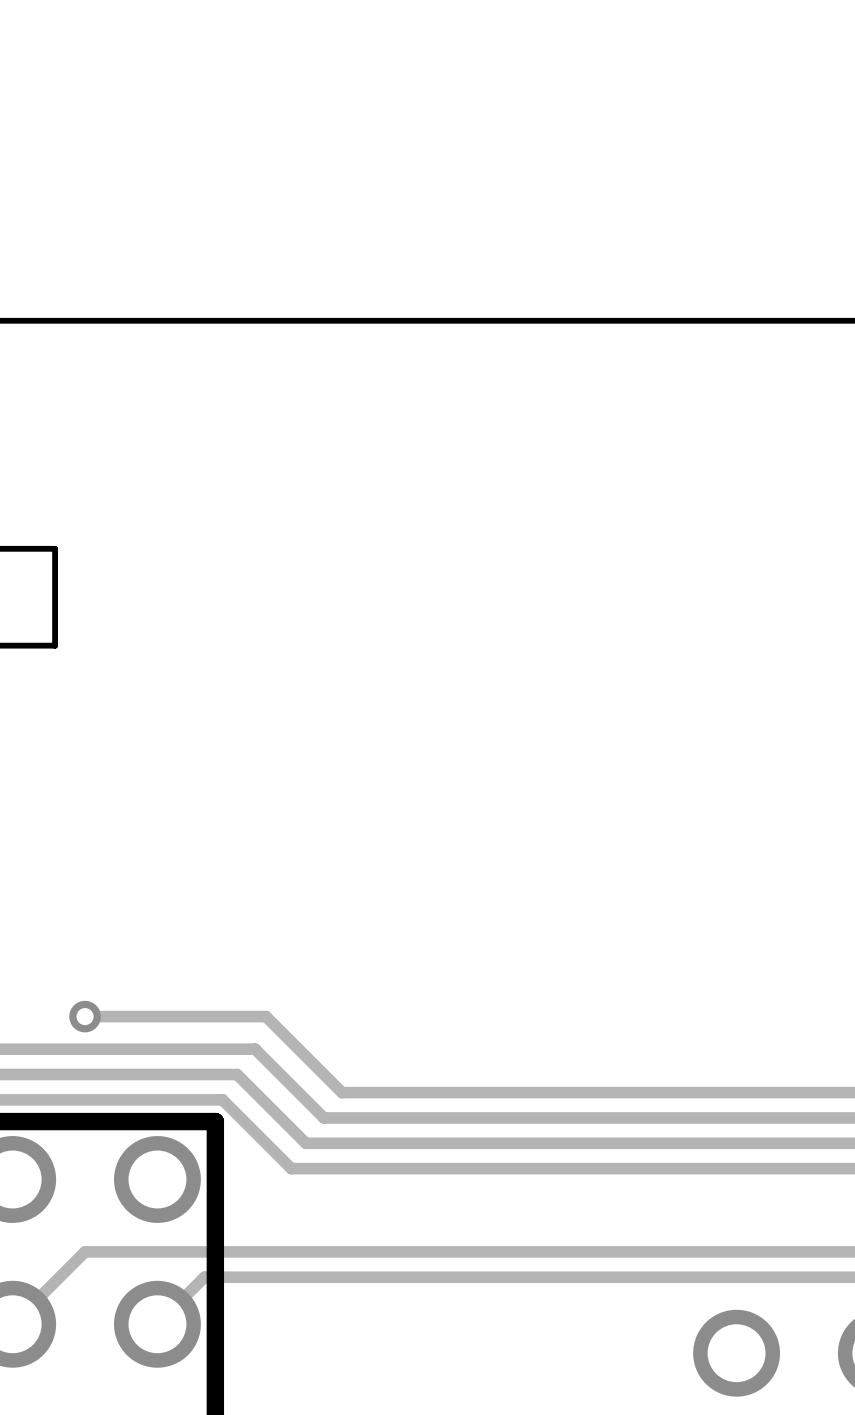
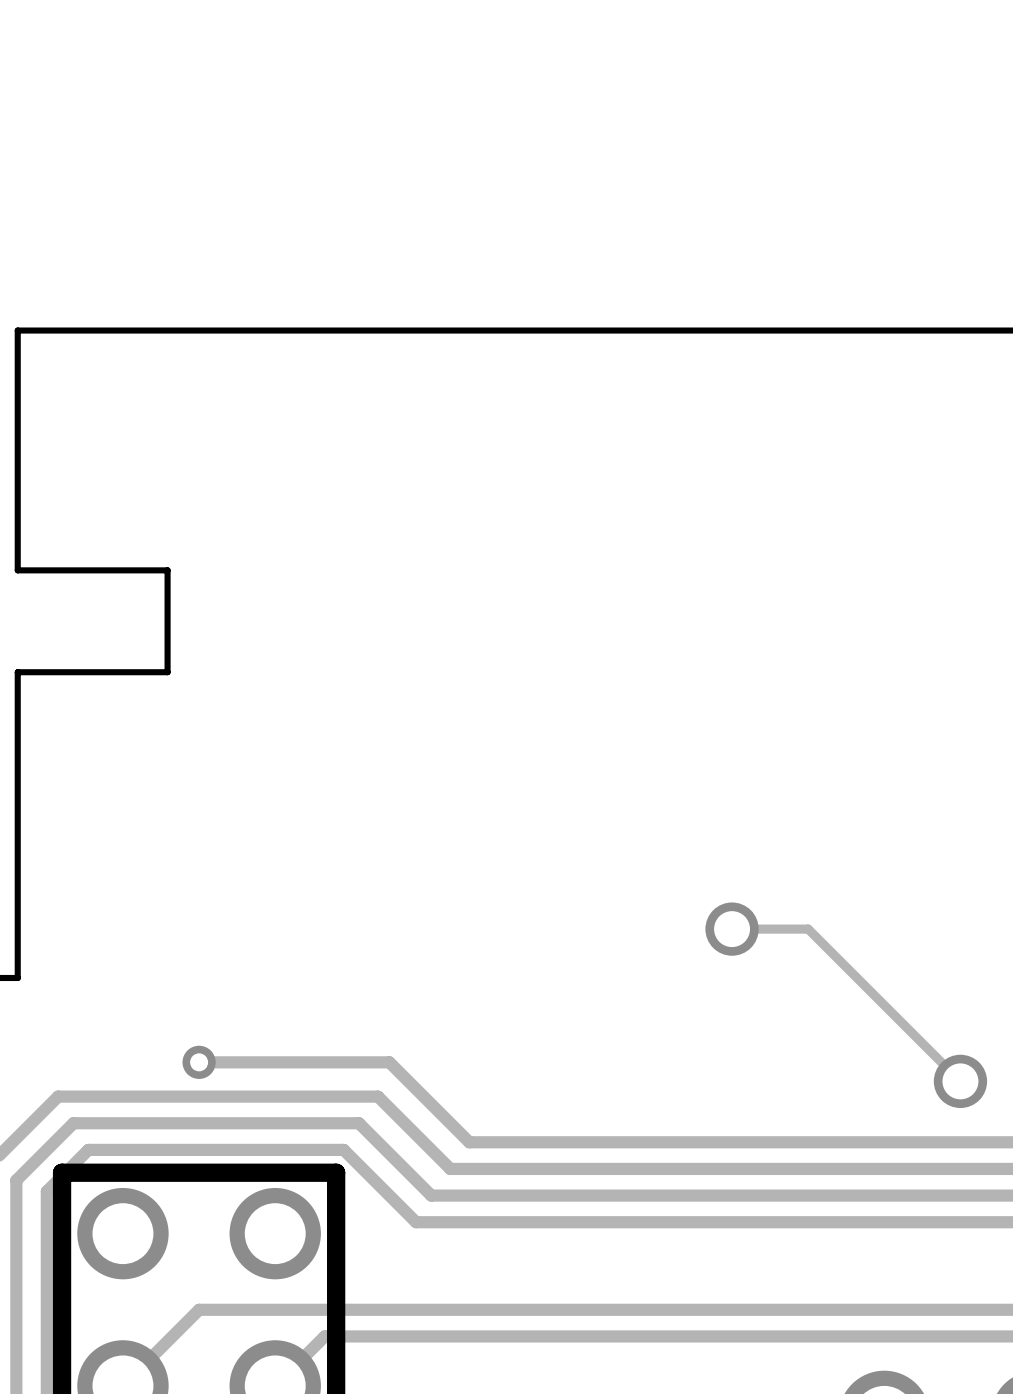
track: none -> (732, 929) (808, 929) (960, 1081)
via: none -> (732, 929)
via: none -> (960, 1081)

